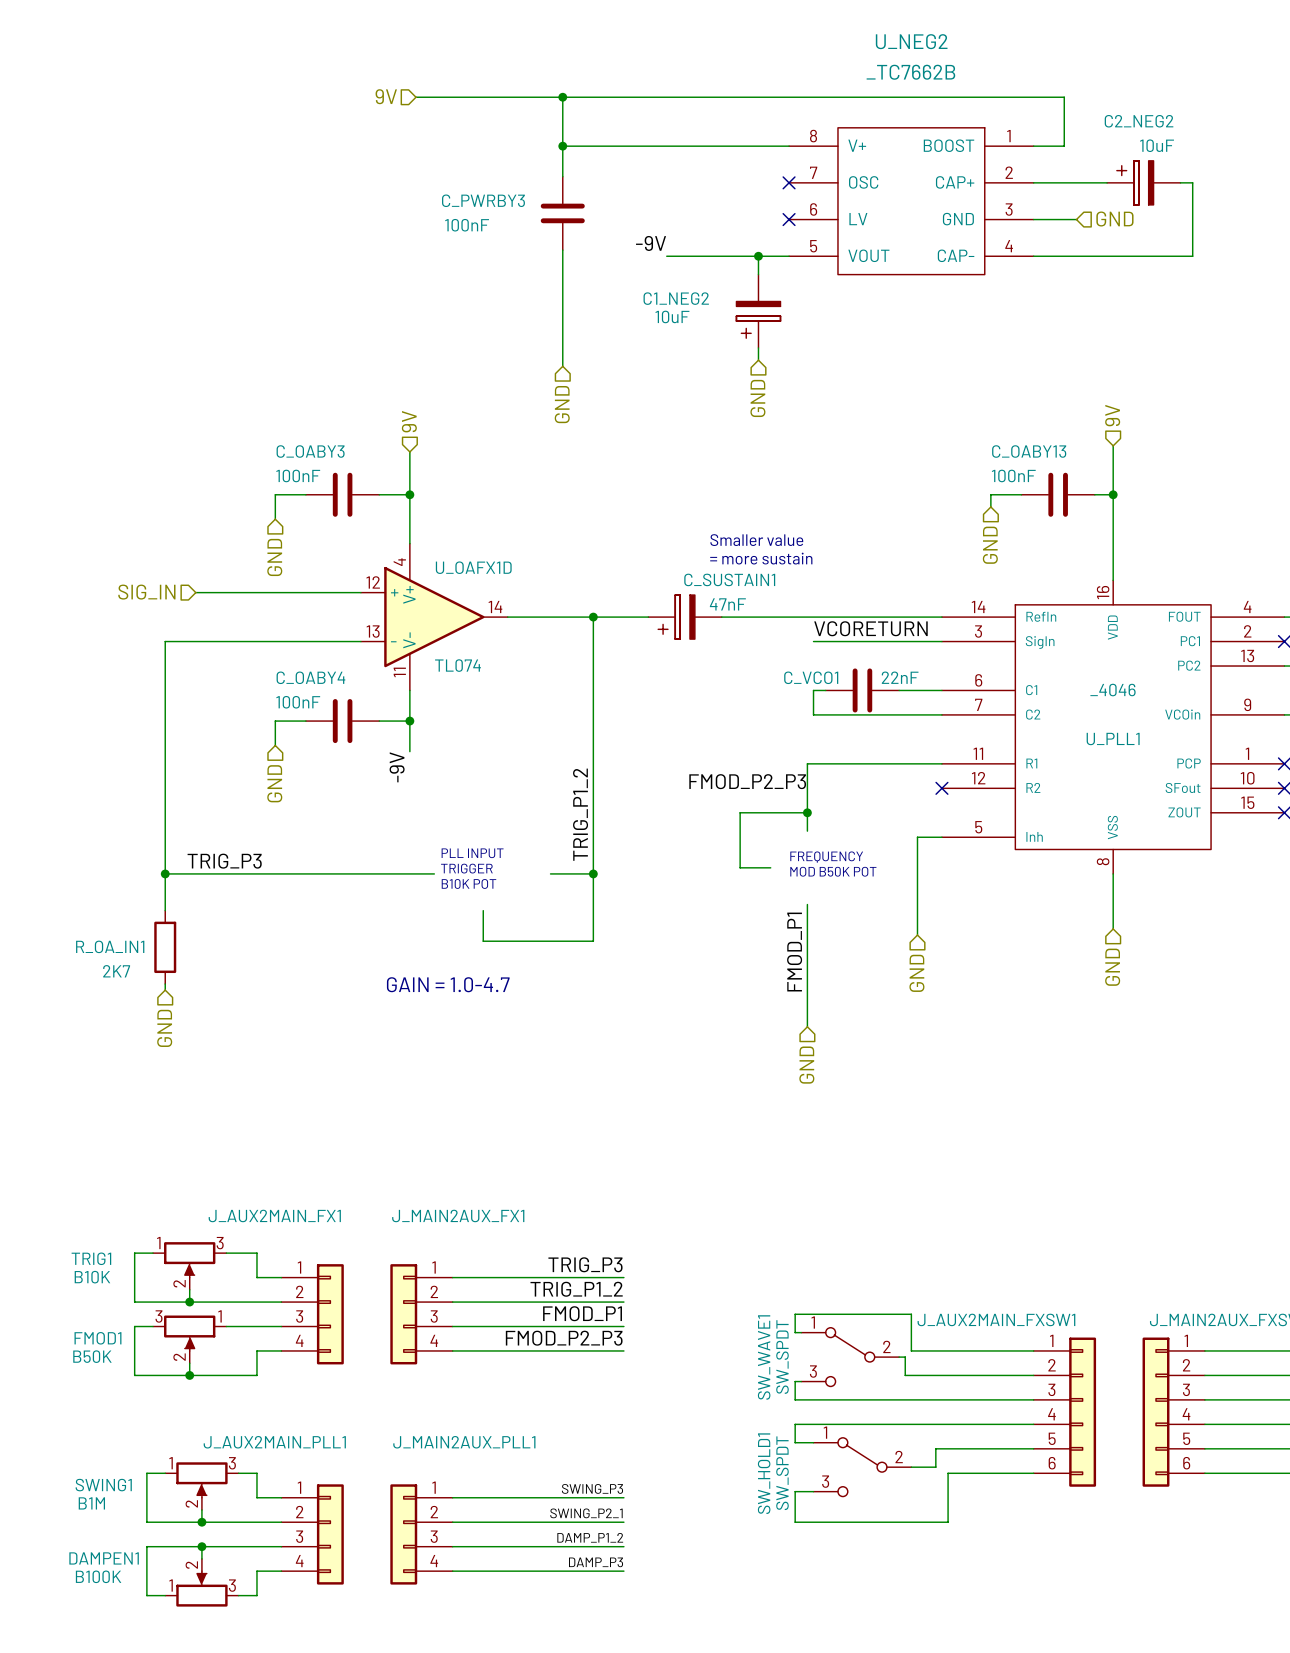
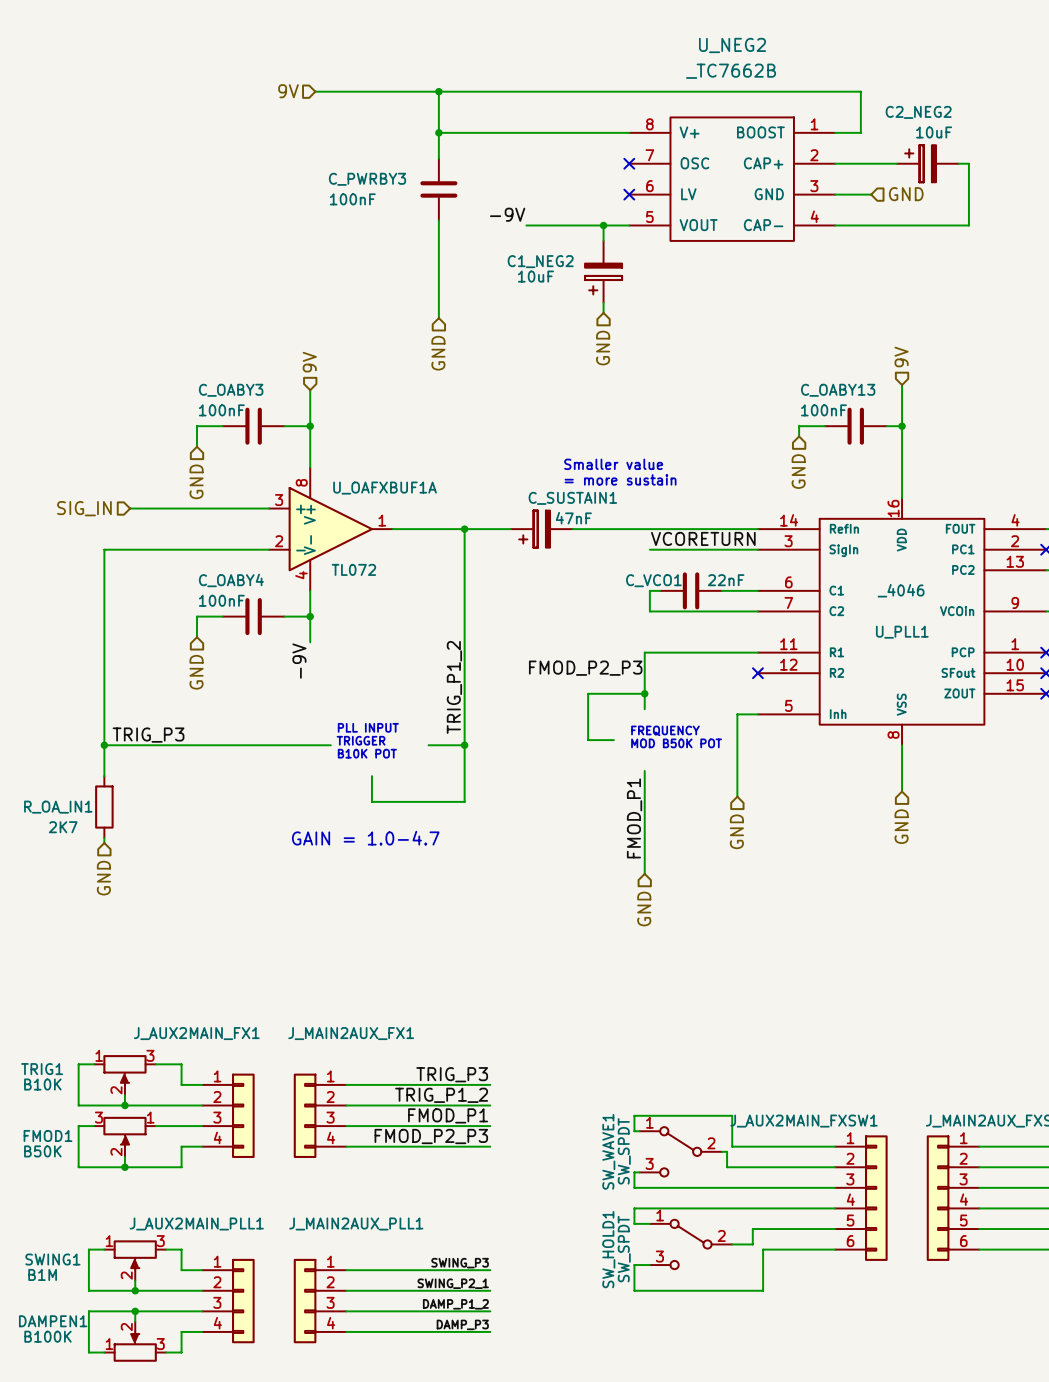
U_OAFX1D pin number: 4 (399, 562) -> 8 (301, 482)
U_OAFX1D name: U_OAFX1D (473, 567) -> U_OAFXBUF1A (385, 488)
U_OAFX1D pin number: 12 (373, 582) -> 3 (279, 500)
U_OAFX1D pin number: 14 (495, 606) -> 1 (382, 520)
U_OAFX1D pin number: 13 (373, 631) -> 2 (279, 541)
U_OAFX1D value: TL074 (458, 665) -> TL072 (353, 569)
U_OAFX1D pin number: 11 (399, 672) -> 4 (301, 575)

